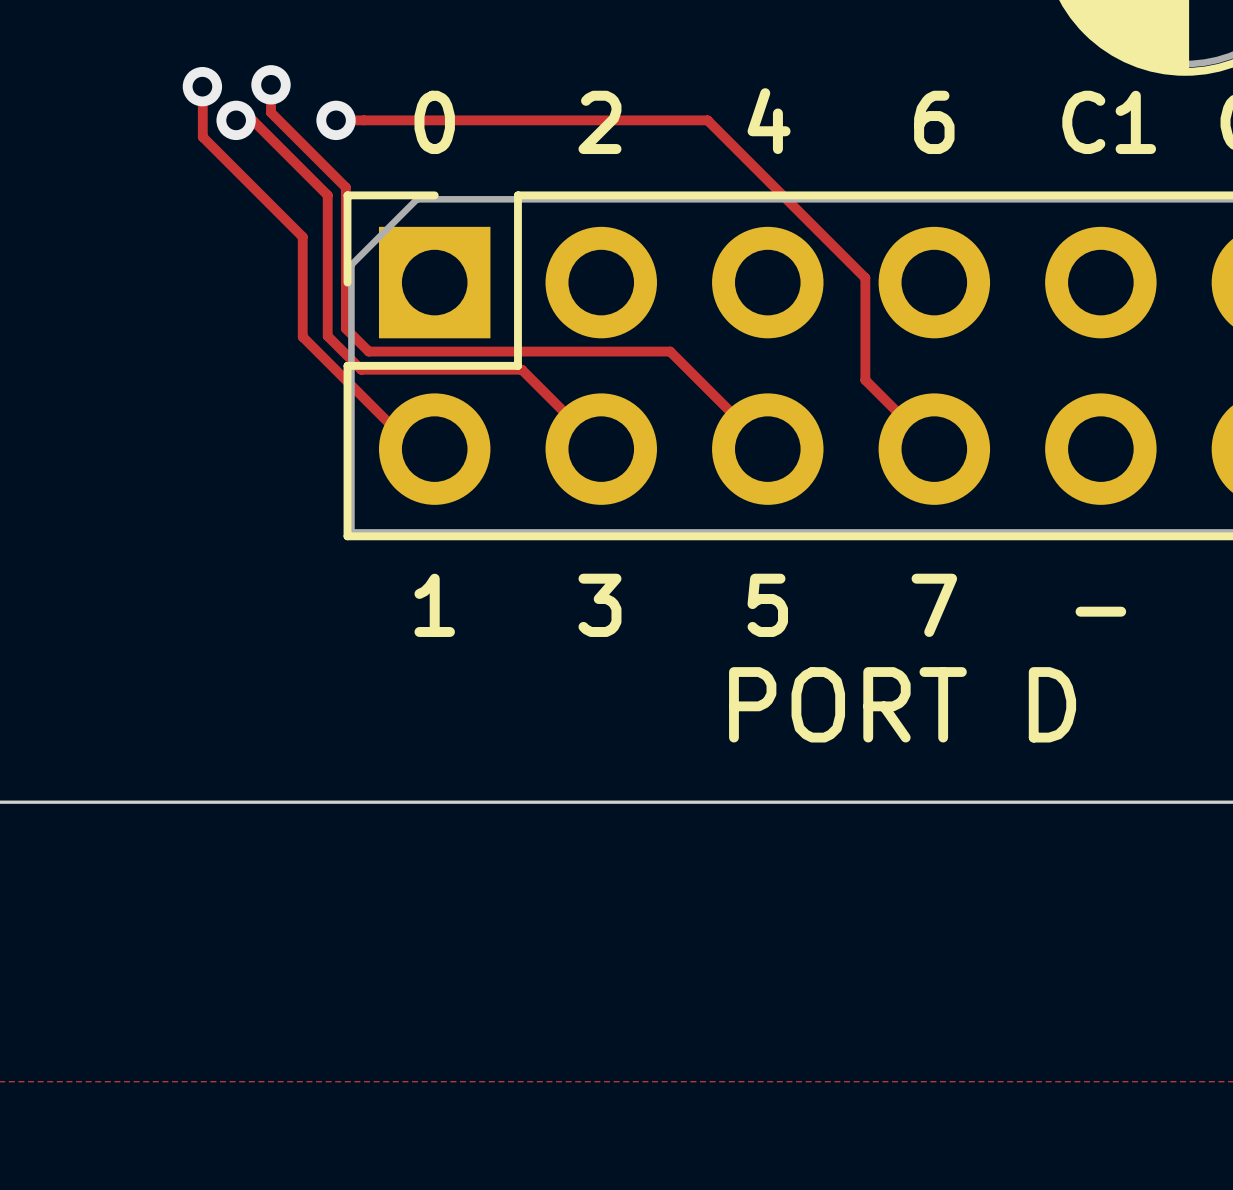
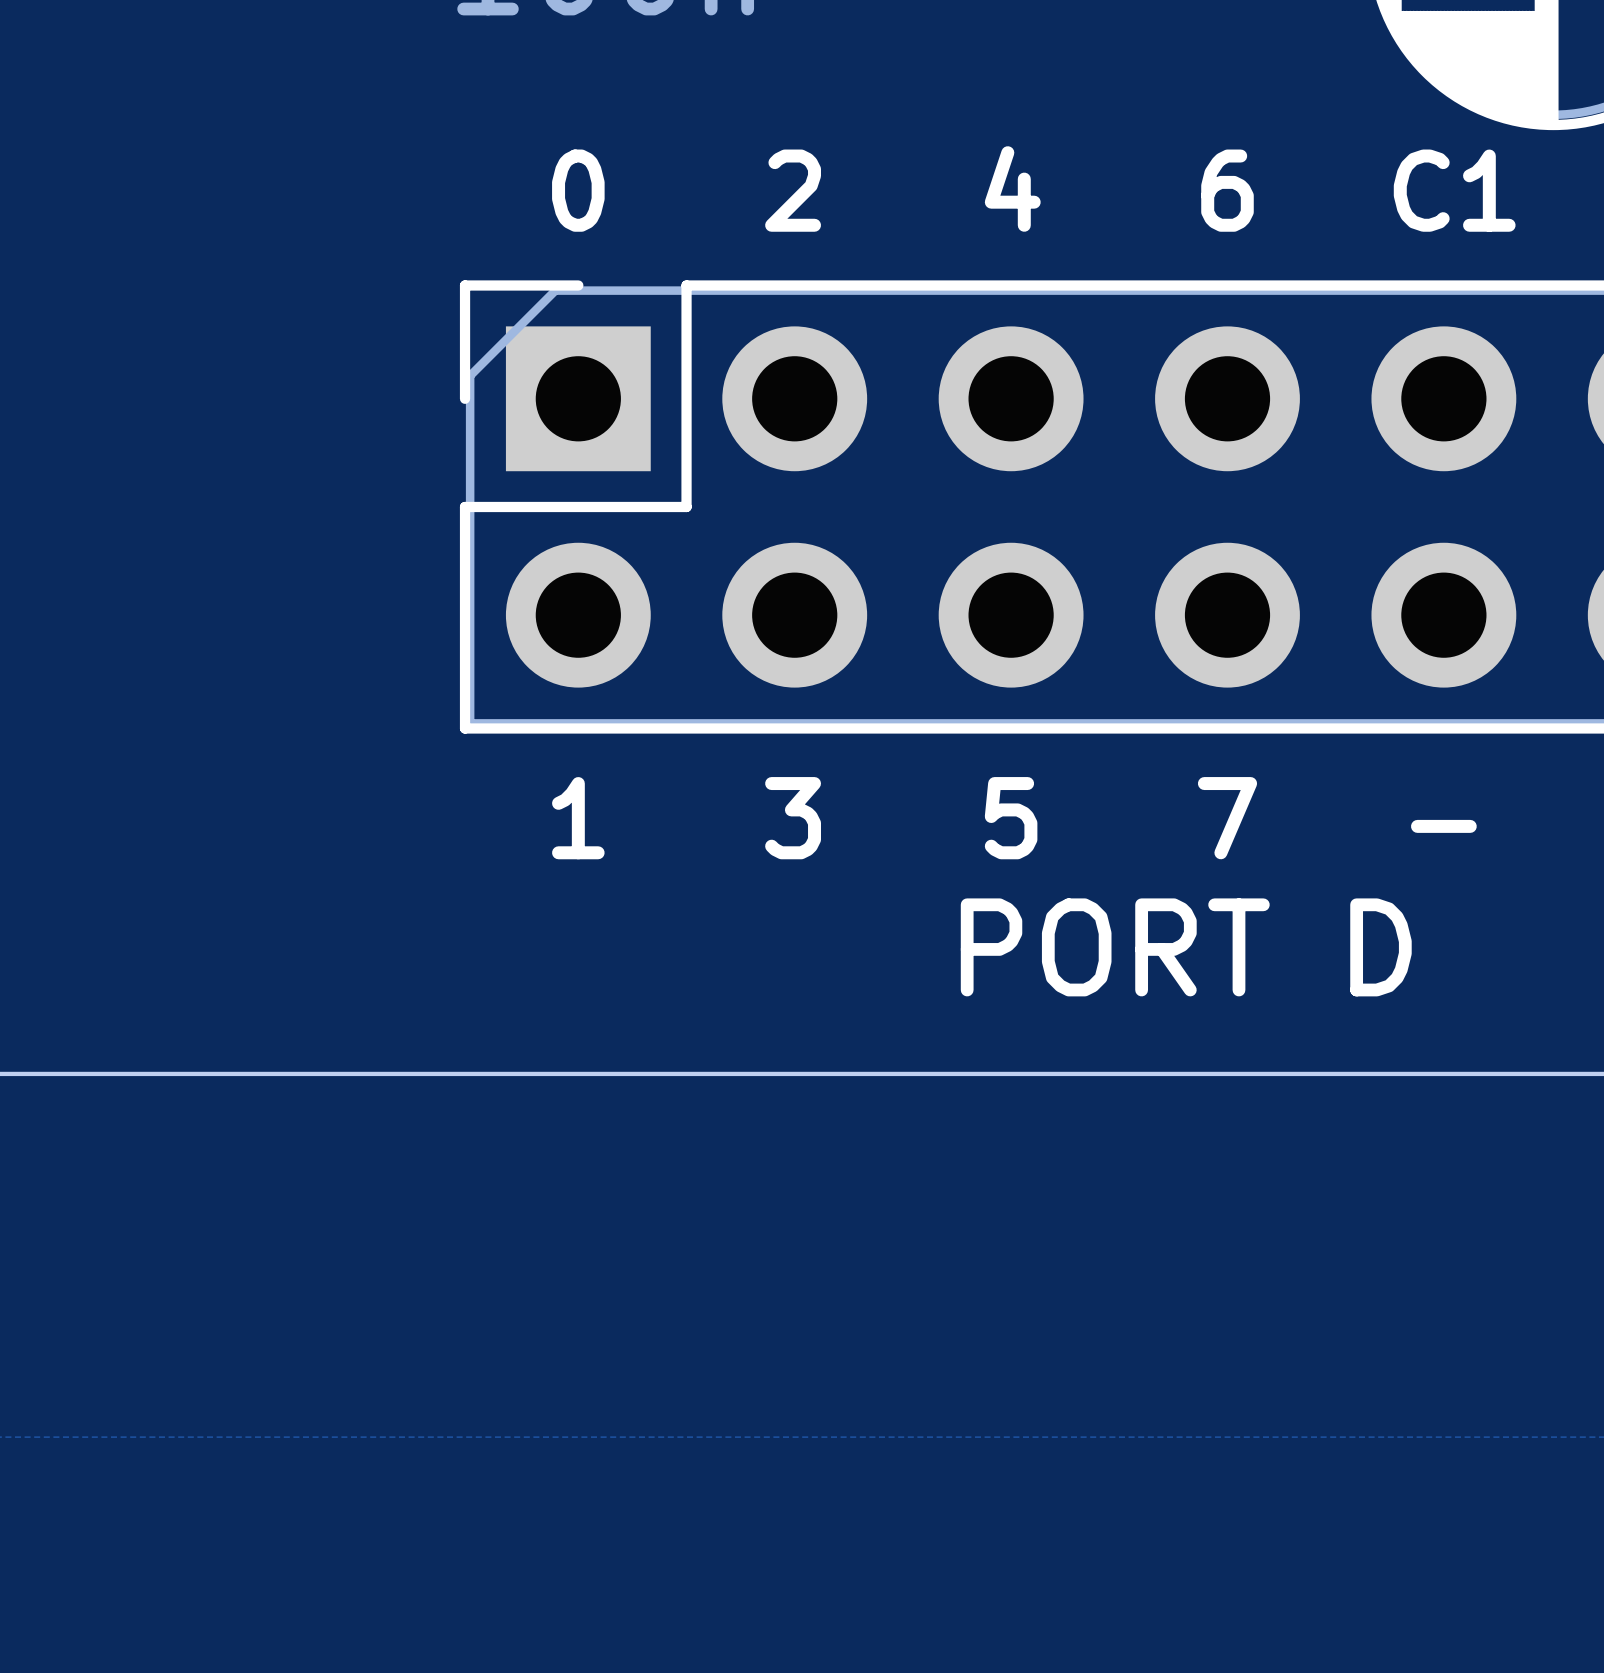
track: (271, 84) (271, 112) (345, 187) (345, 328) (368, 351) (670, 351) (767, 449) -> none
via: (271, 84) -> none
via: (202, 86) -> none
track: (202, 87) (202, 137) (302, 236) (302, 336) (414, 449) (434, 449) -> none
track: (236, 120) (252, 120) (327, 195) (327, 336) (361, 369) (521, 369) (601, 449) -> none
via: (236, 120) -> none
track: (336, 120) (707, 120) (865, 278) (865, 380) (934, 449) -> none
via: (336, 120) -> none

